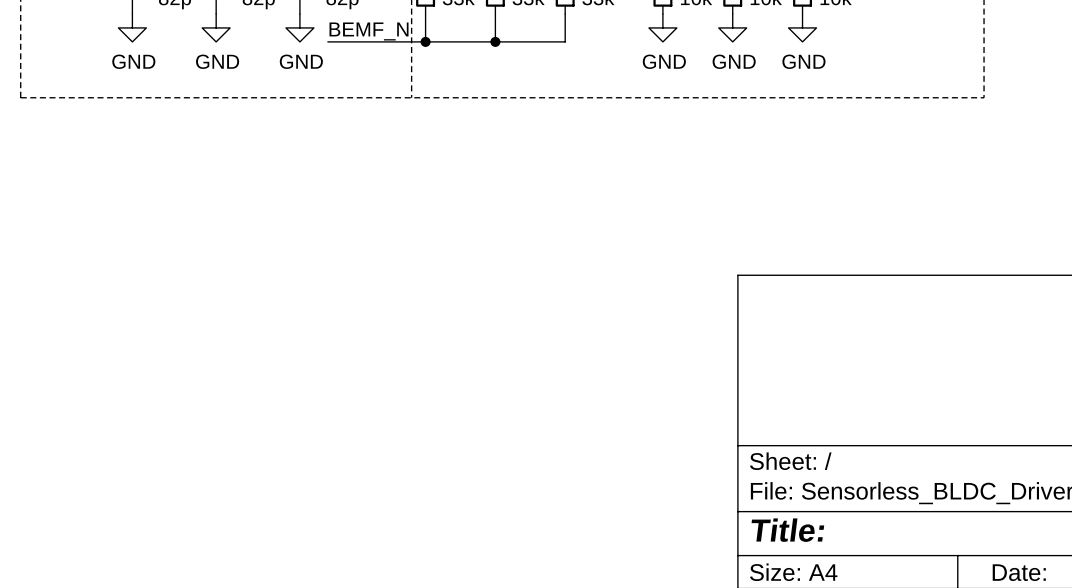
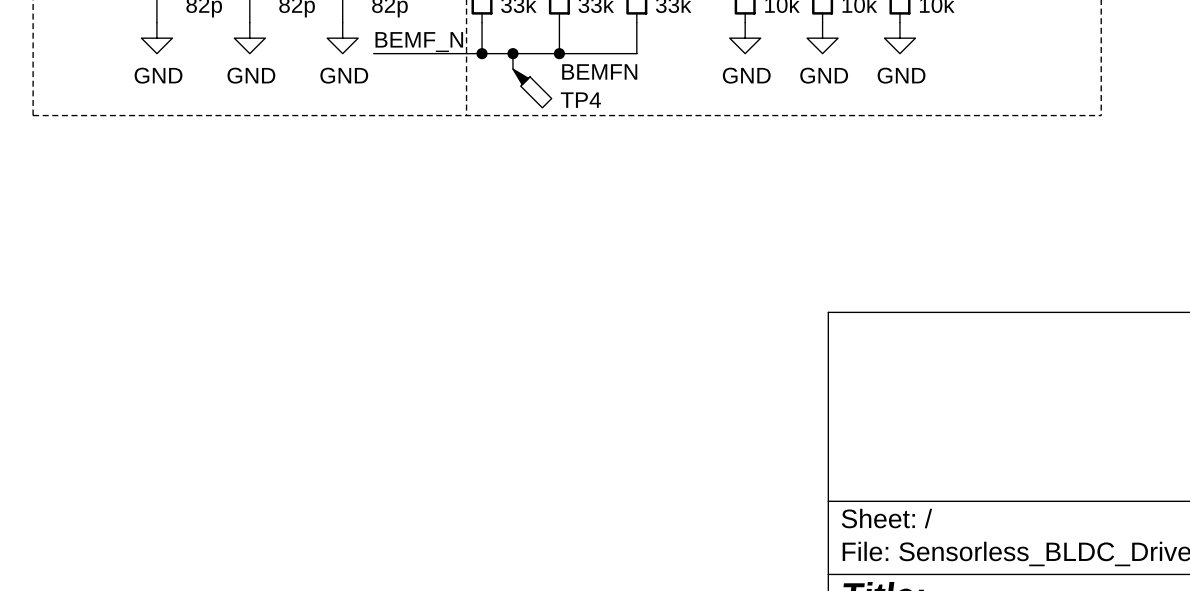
wire: none -> (512, 53) (512, 69)
junction: none -> (512, 53)
TP4: none -> BEMFN (532, 88)

